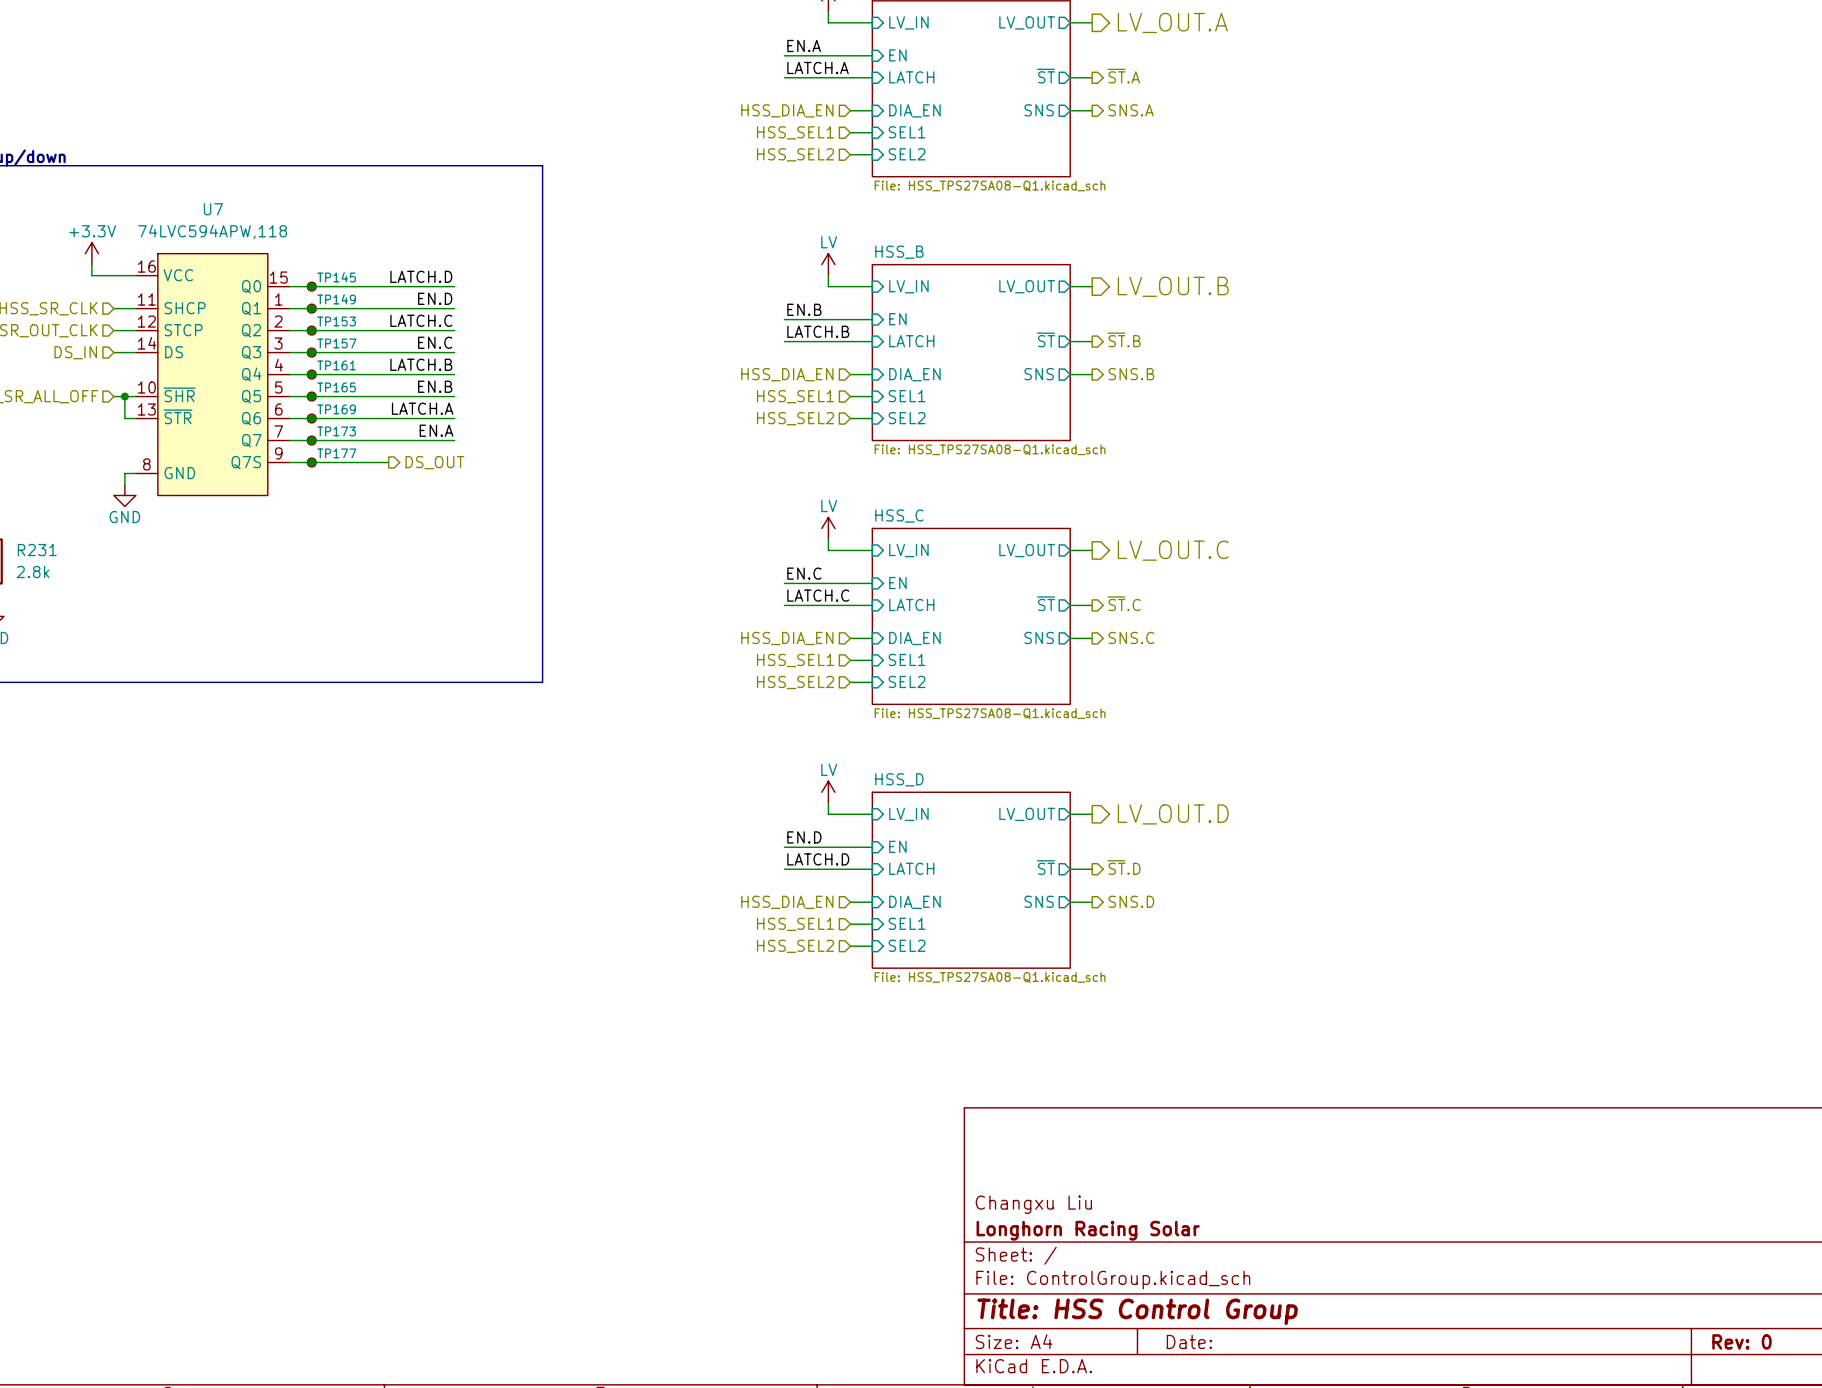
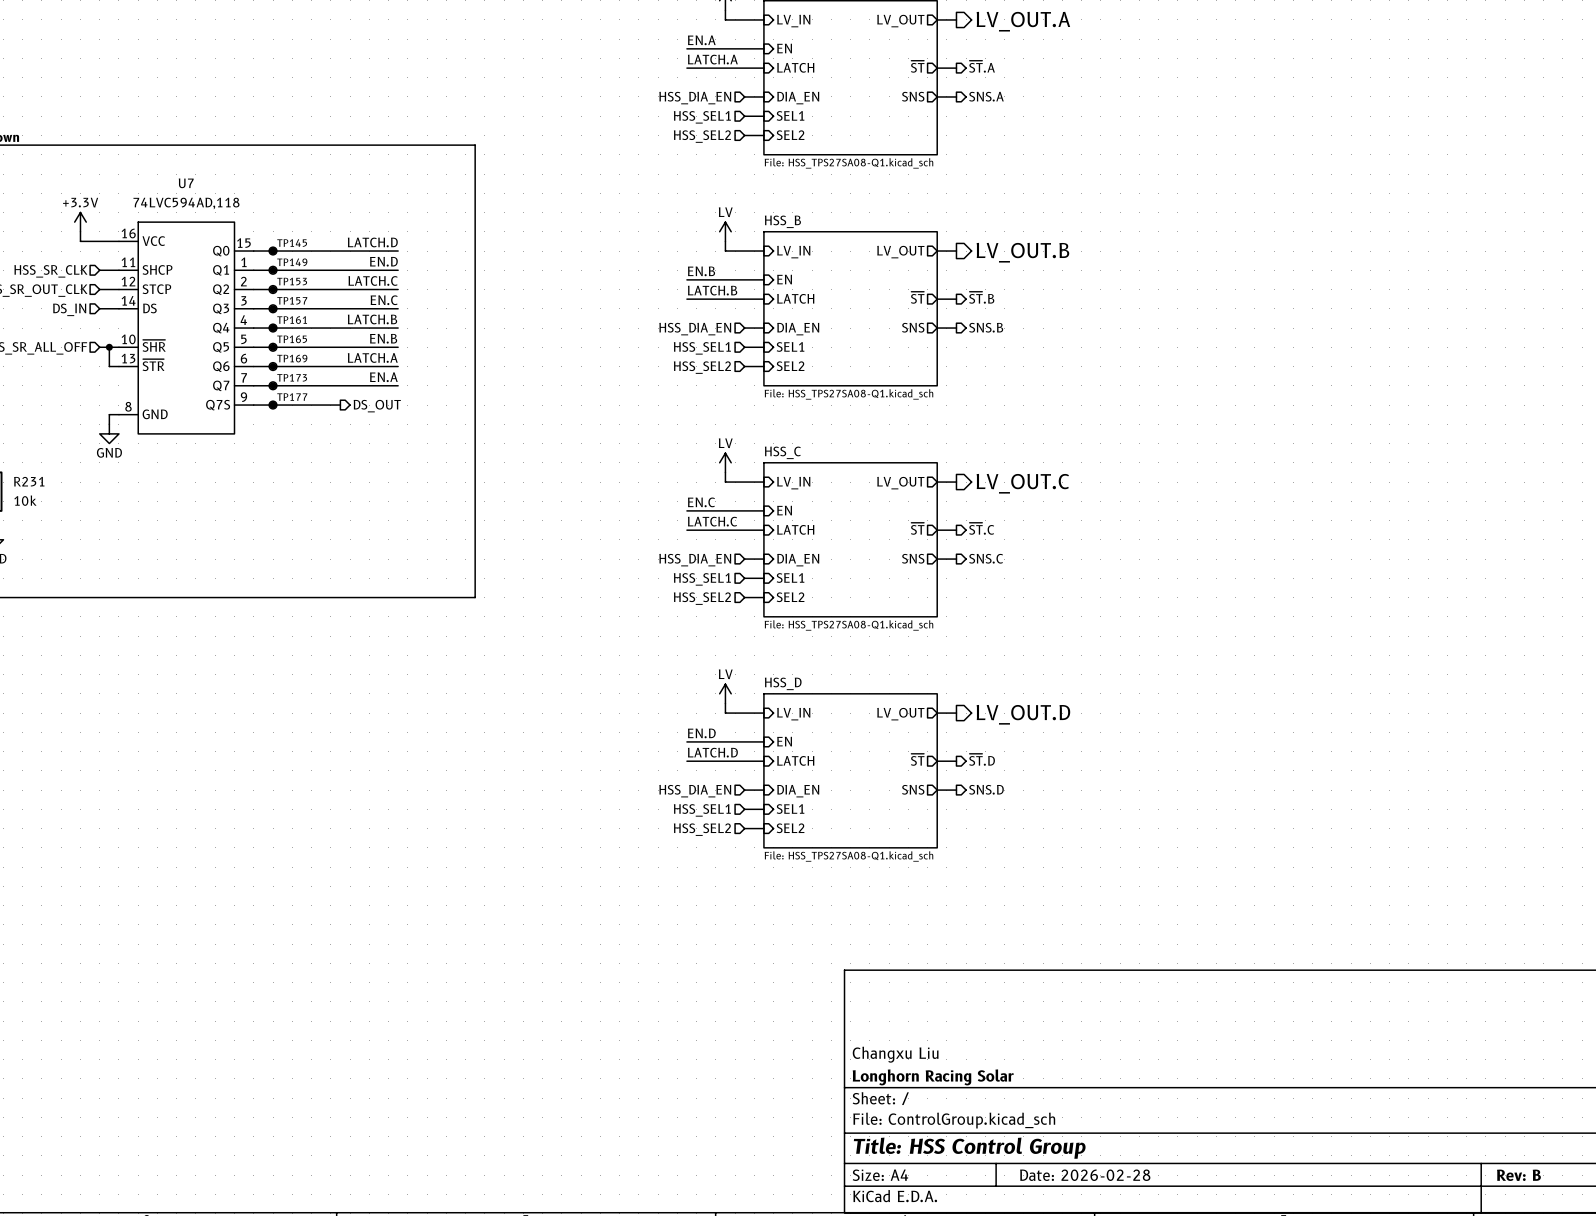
U7 value: 74LVC594APW,118 (212, 231) -> 74LVC594AD,118 (186, 203)
R231 value: 2.8k (33, 572) -> 10k (25, 500)
title block: Date: (1189, 1341) -> Date: 2026-02-28 (1085, 1175)
title block: Rev: 0 (1741, 1341) -> Rev: B (1518, 1175)

